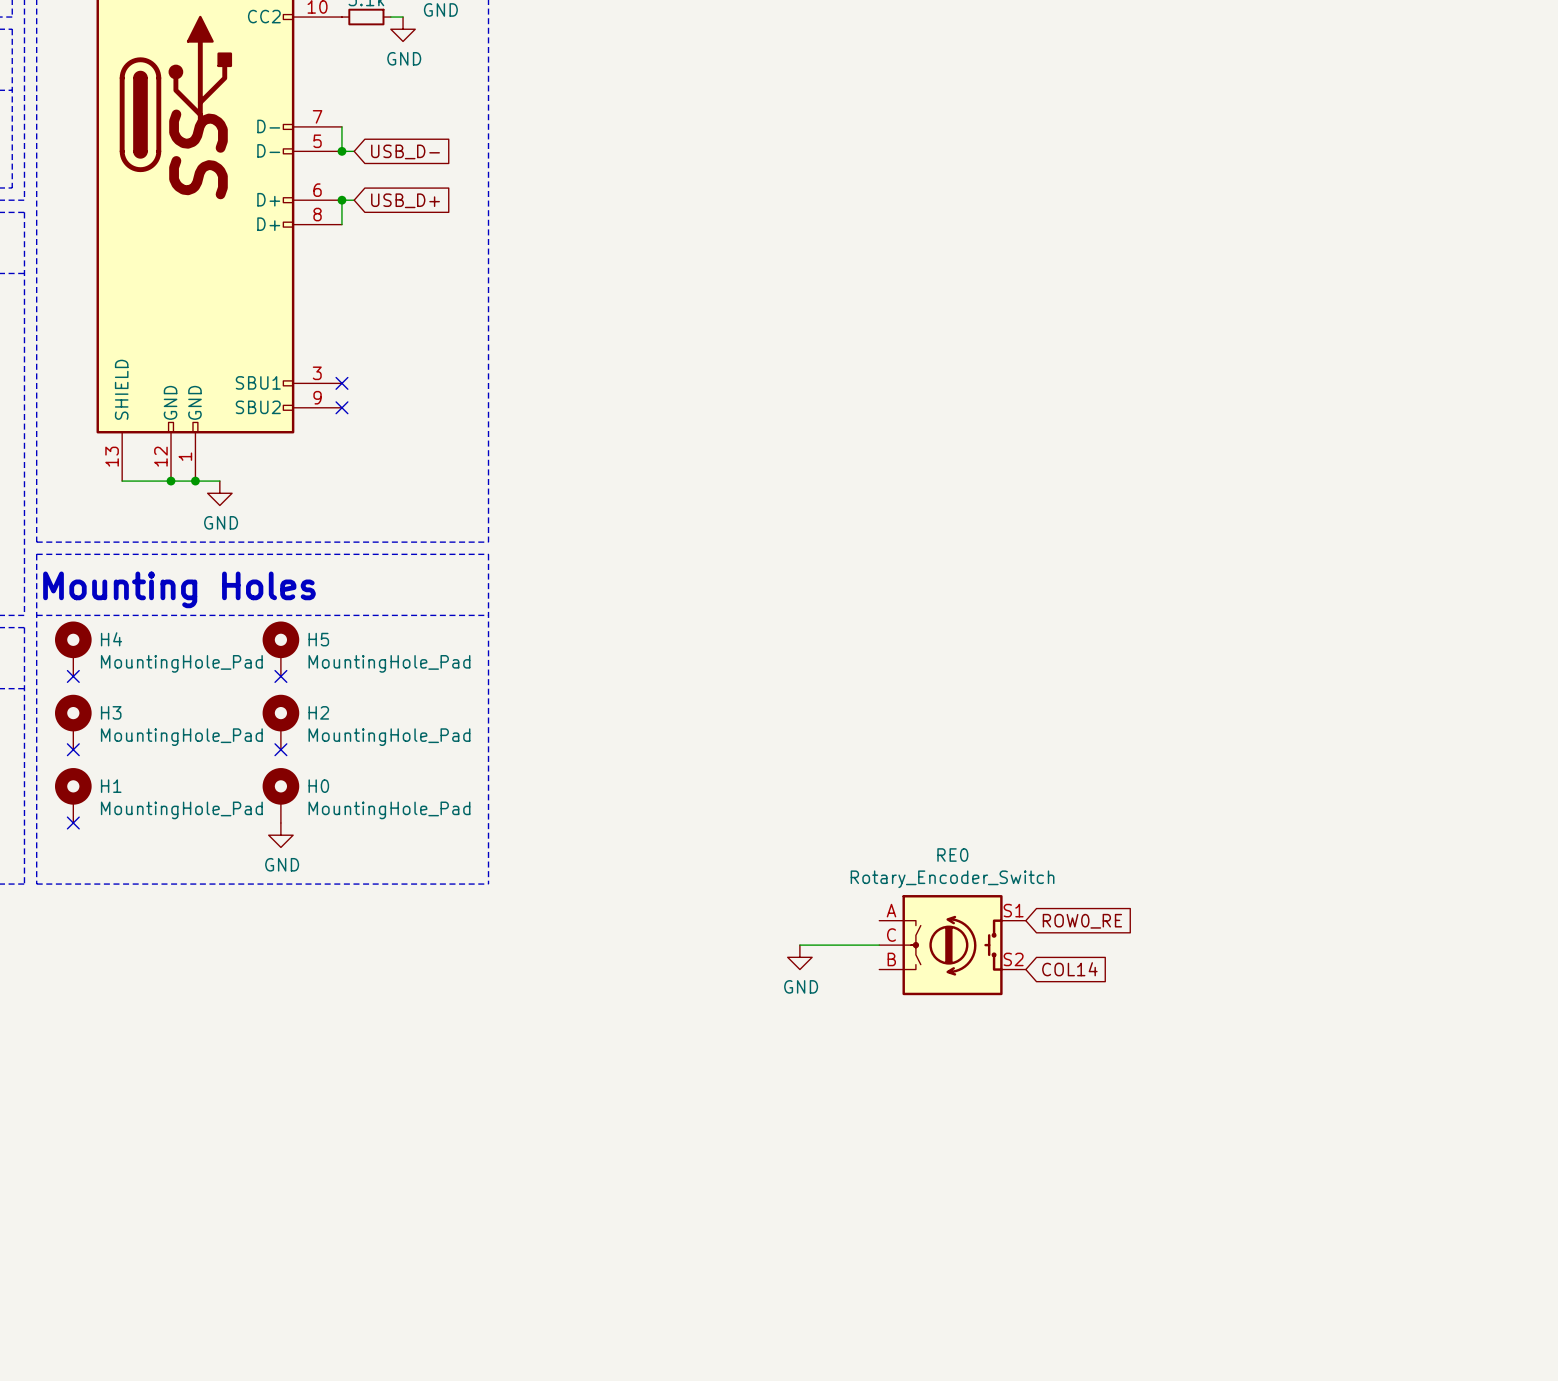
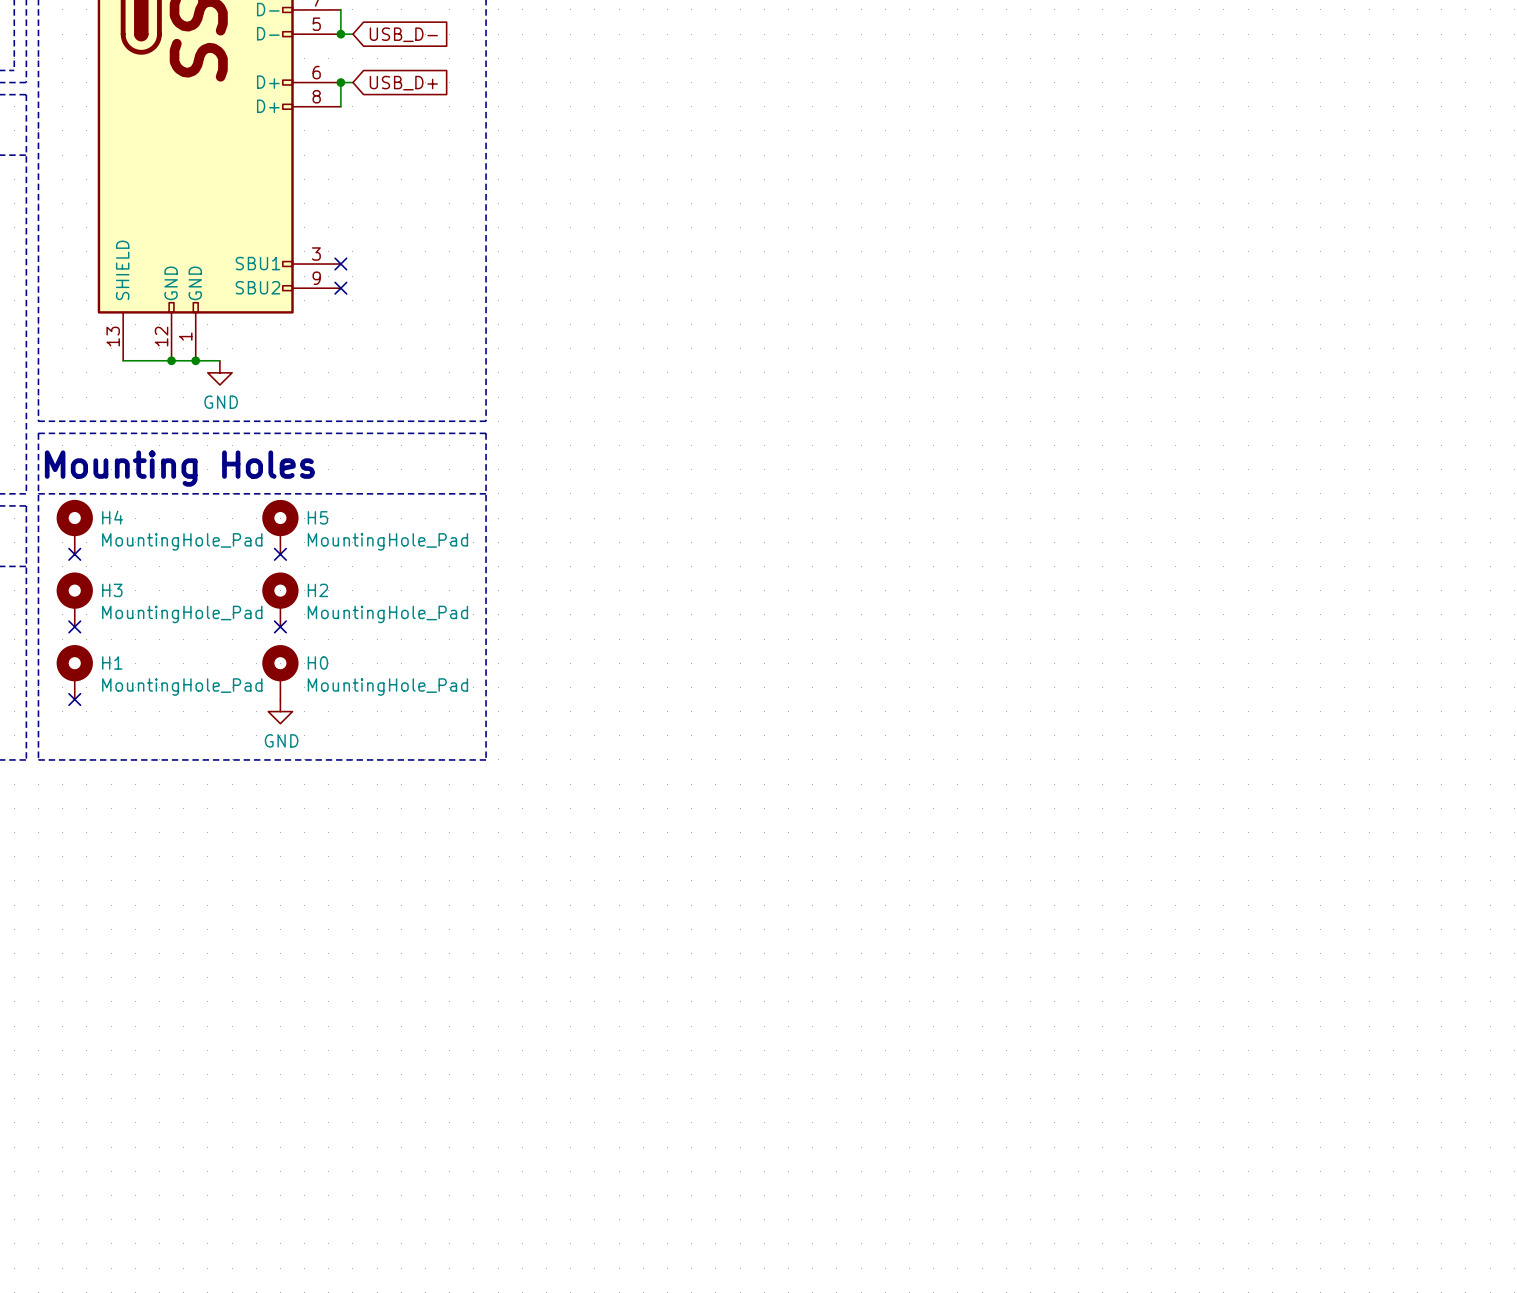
global label: ROW0_RE (1082, 921) -> none
wire: (799, 945) (879, 945) -> none
RE0: Rotary_Encoder_Switch (952, 945) -> none
power symbol: GND (799, 957) -> none
global label: COL14 (1069, 969) -> none

